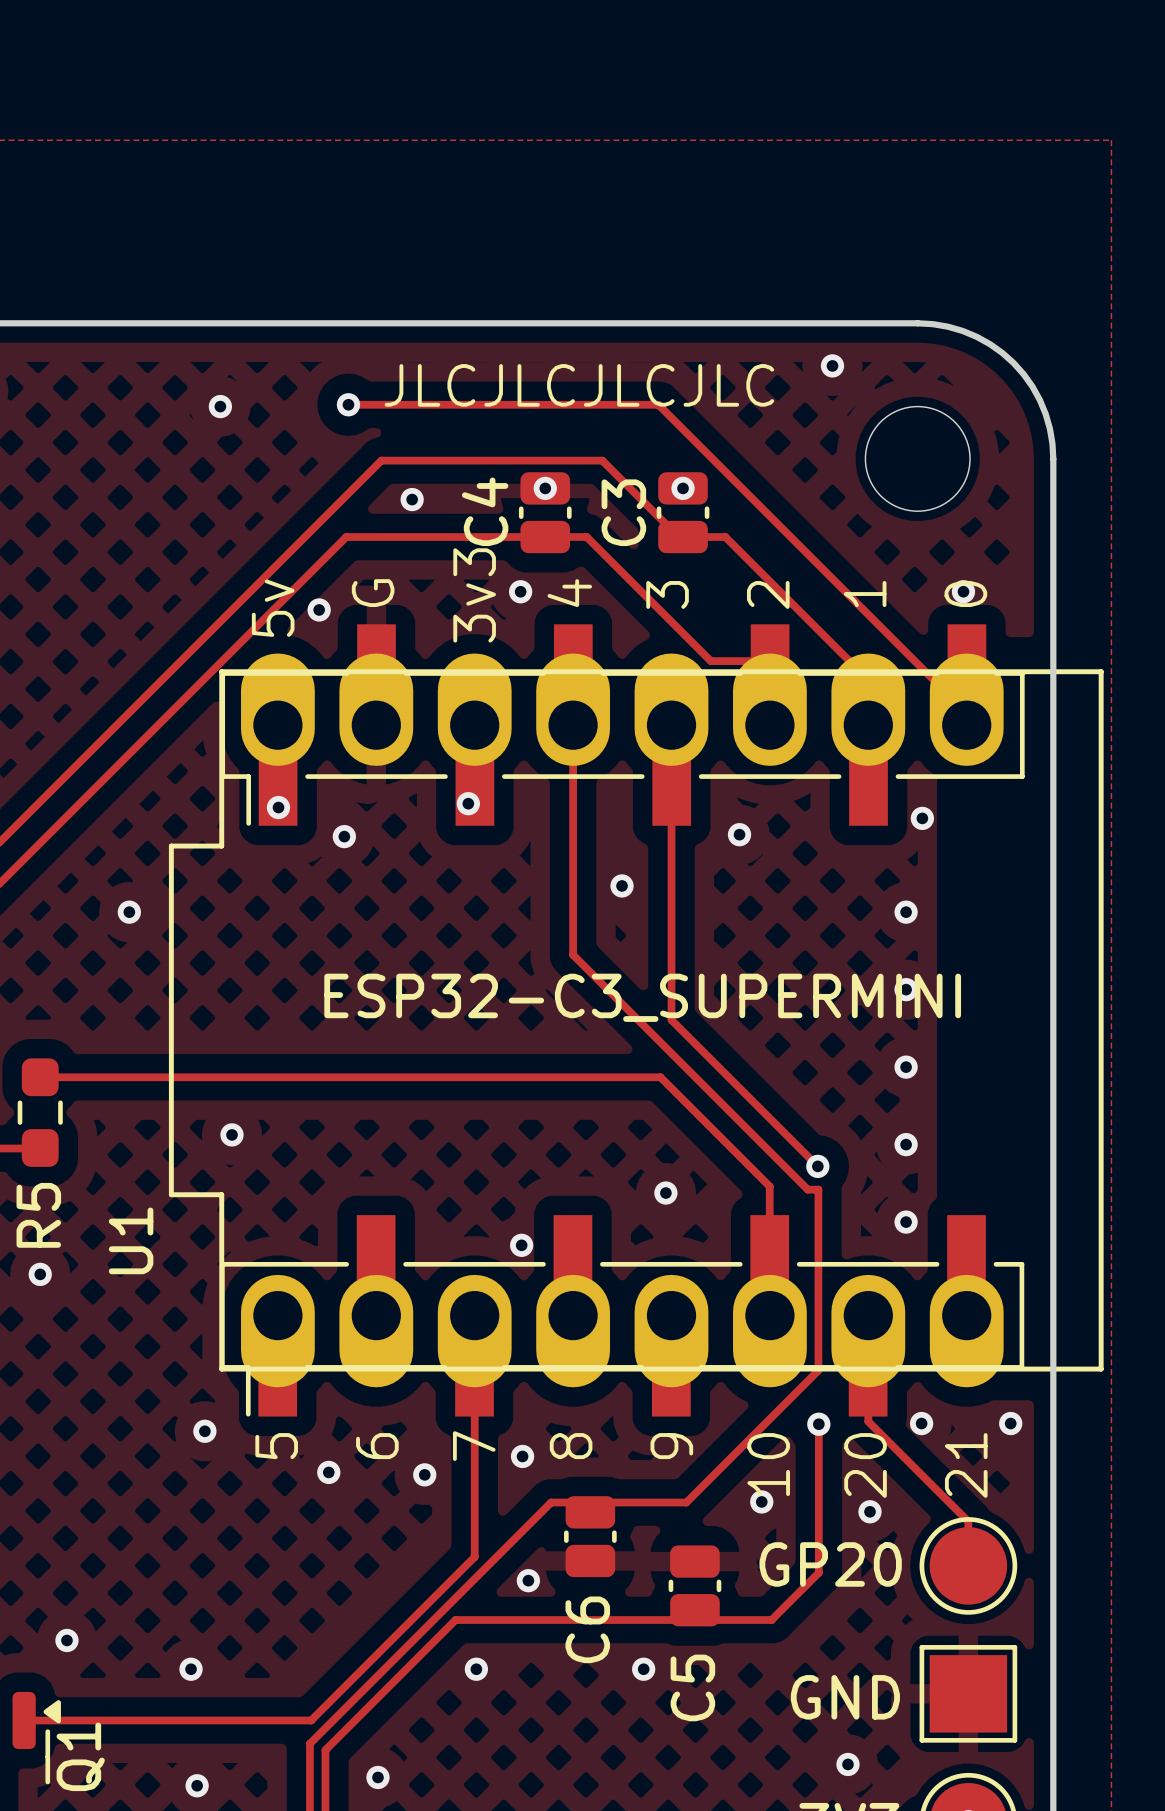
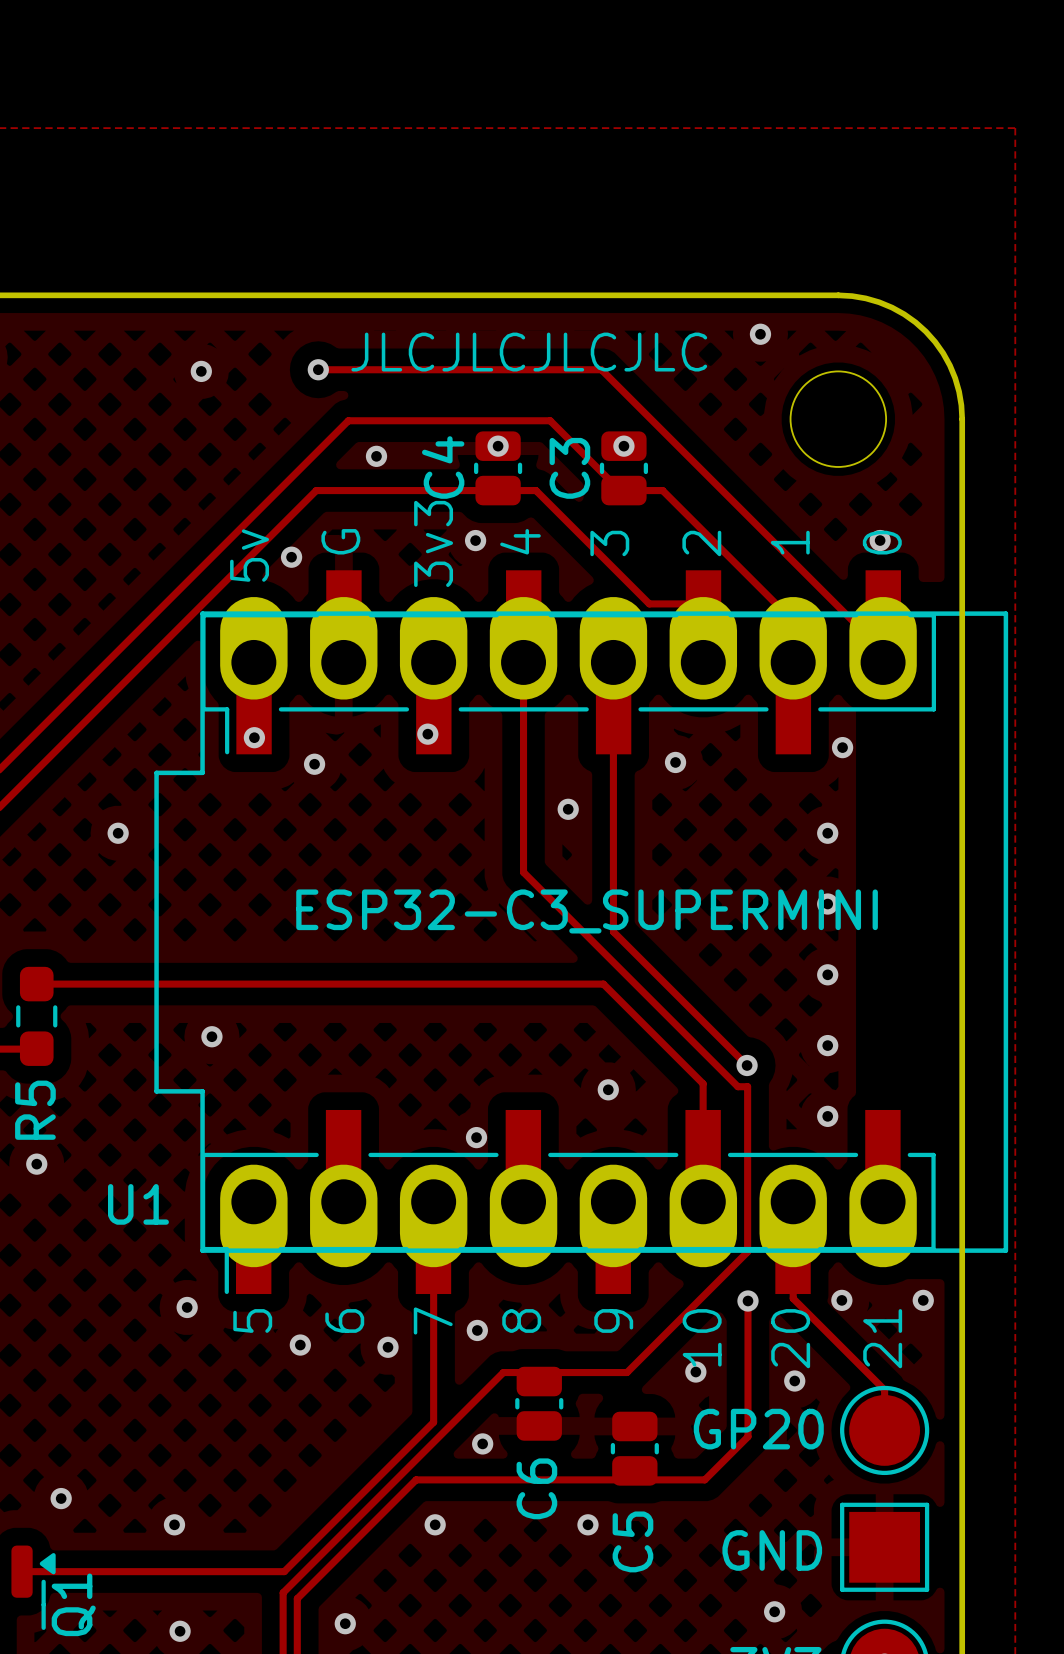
U1 name rotation: 0° (131, 1240) -> 90° clockwise (138, 1204)

